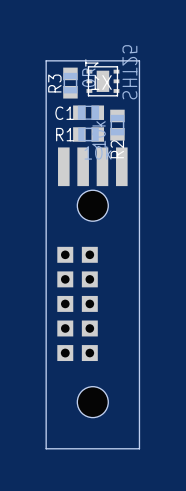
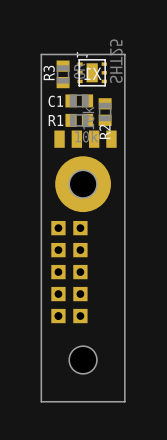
part: none -> (85, 139)
part: (92, 166) -> none
part: none -> (83, 184)

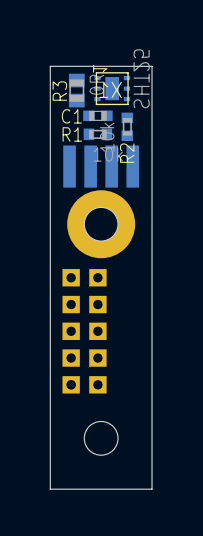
C1 footprint: [65, 94, 94, 108] -> [83, 110, 113, 122]
R2 footprint: [98, 98, 112, 126] -> [121, 112, 134, 142]
R1 footprint: [65, 113, 94, 127] -> [83, 128, 113, 141]
part footprint: [54, 130, 117, 148] -> [63, 145, 140, 188]

